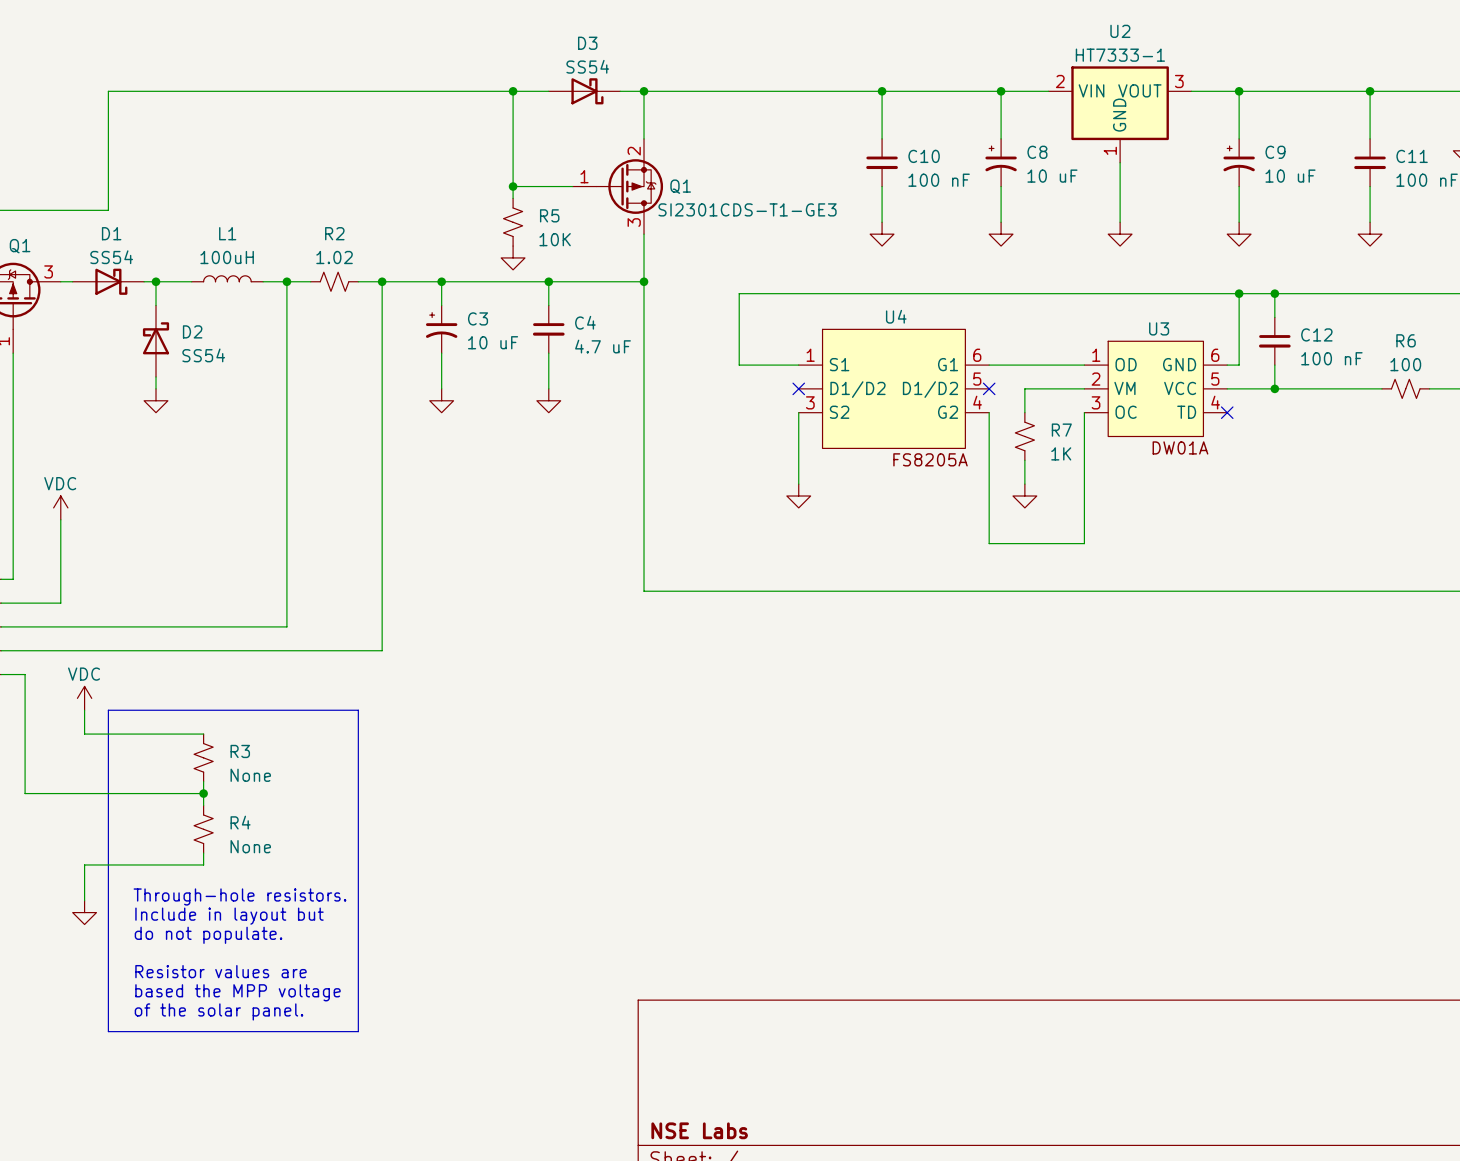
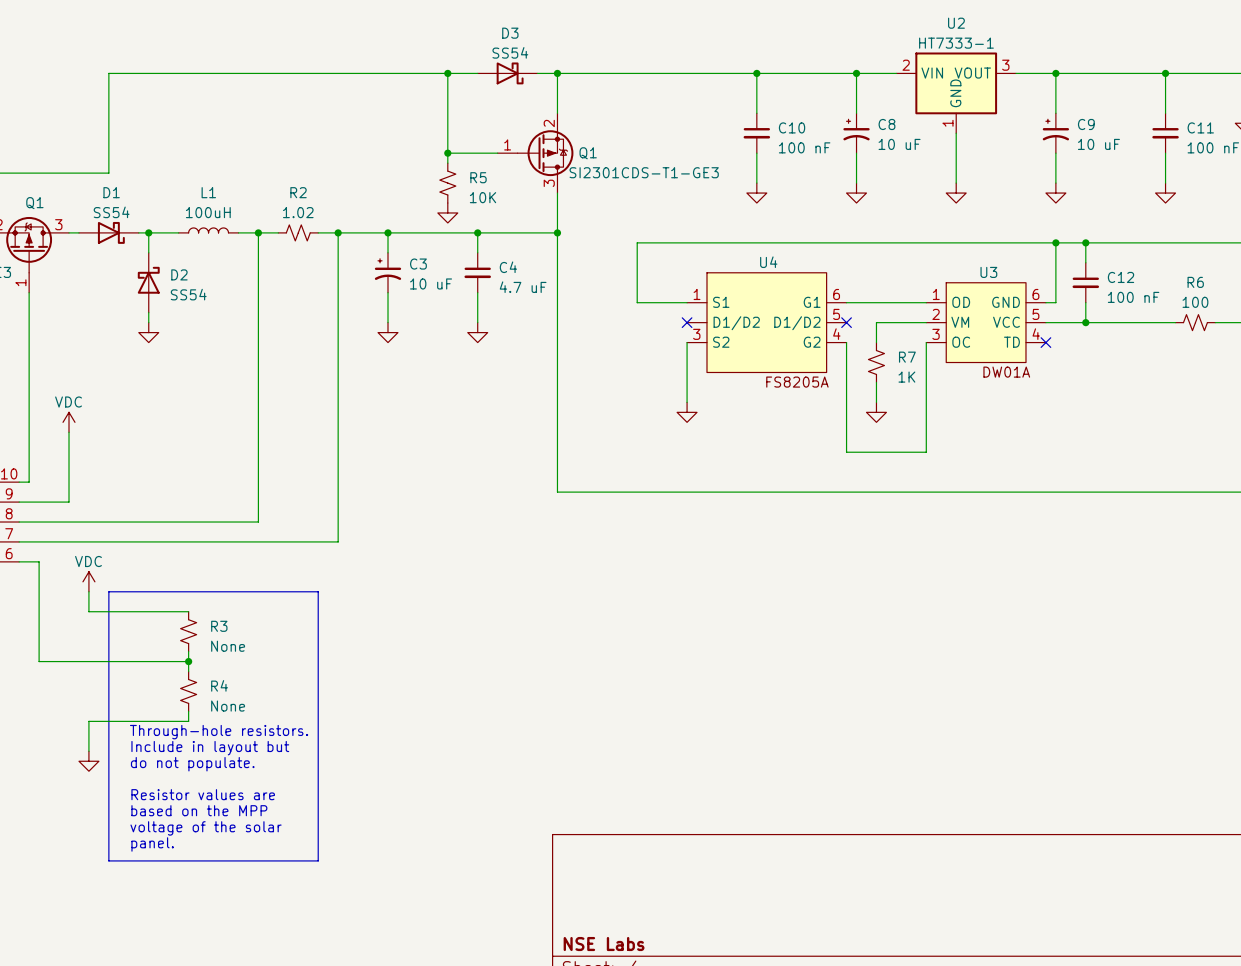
text: none -> Through-hole resistors. (219, 732)
text: Through-hole resistors. (239, 896) -> Include in layout but (210, 748)
text: Include in layout but (229, 916) -> do not populate. (192, 764)
text: do not populate. (208, 935) -> none
text: none -> Resistor values are (203, 794)
text: Resistor values are (220, 971) -> based on the MPP (199, 810)
text: based the MPP voltage (237, 992) -> voltage of the solar (206, 828)
text: of the solar panel. (219, 1011) -> panel. (152, 844)

